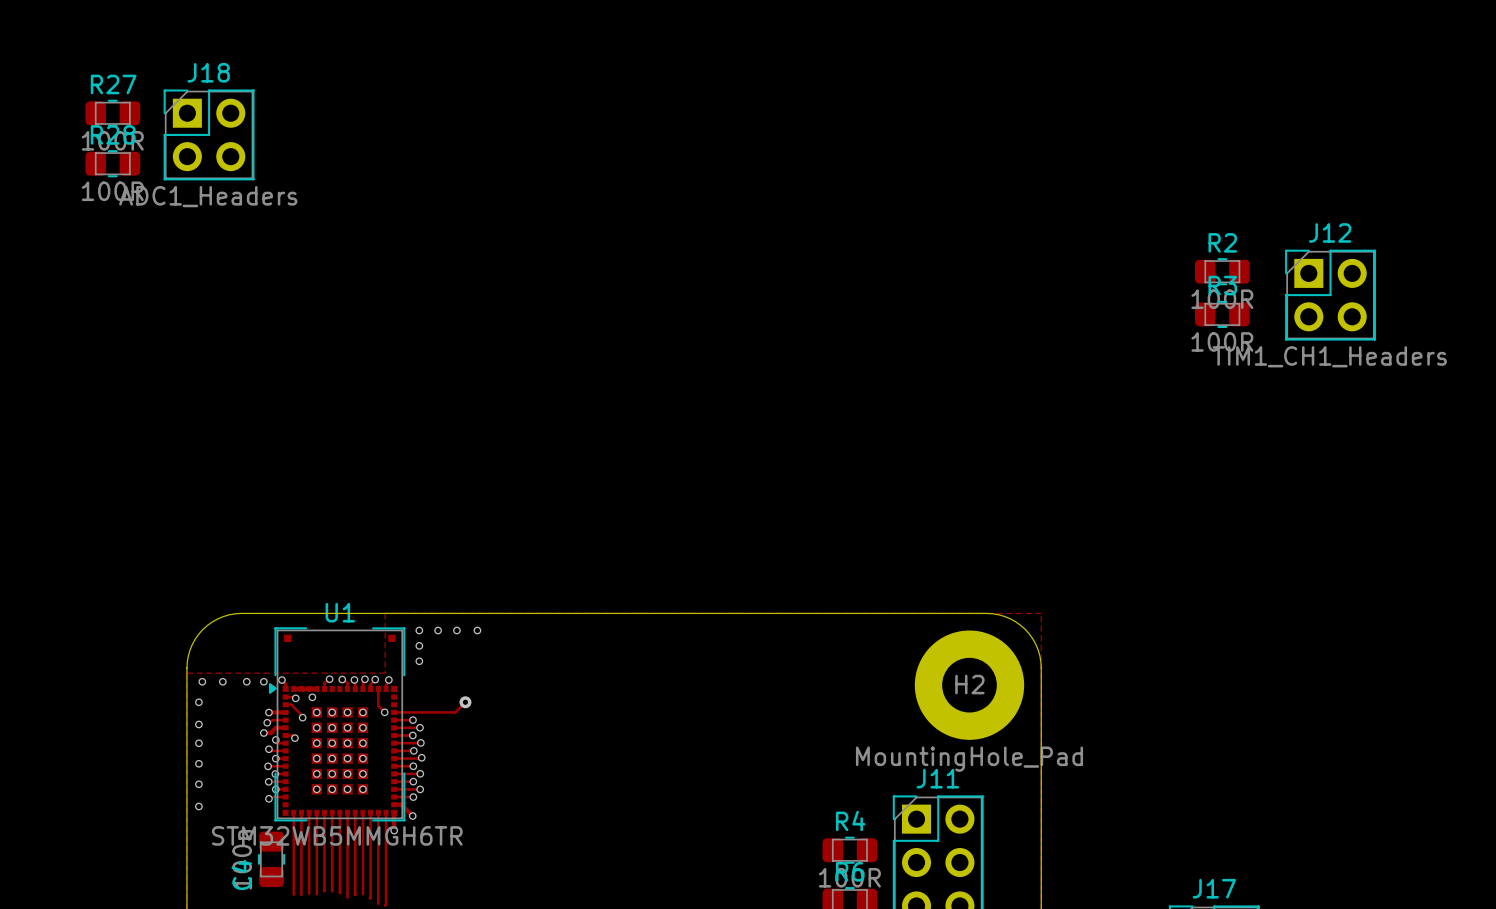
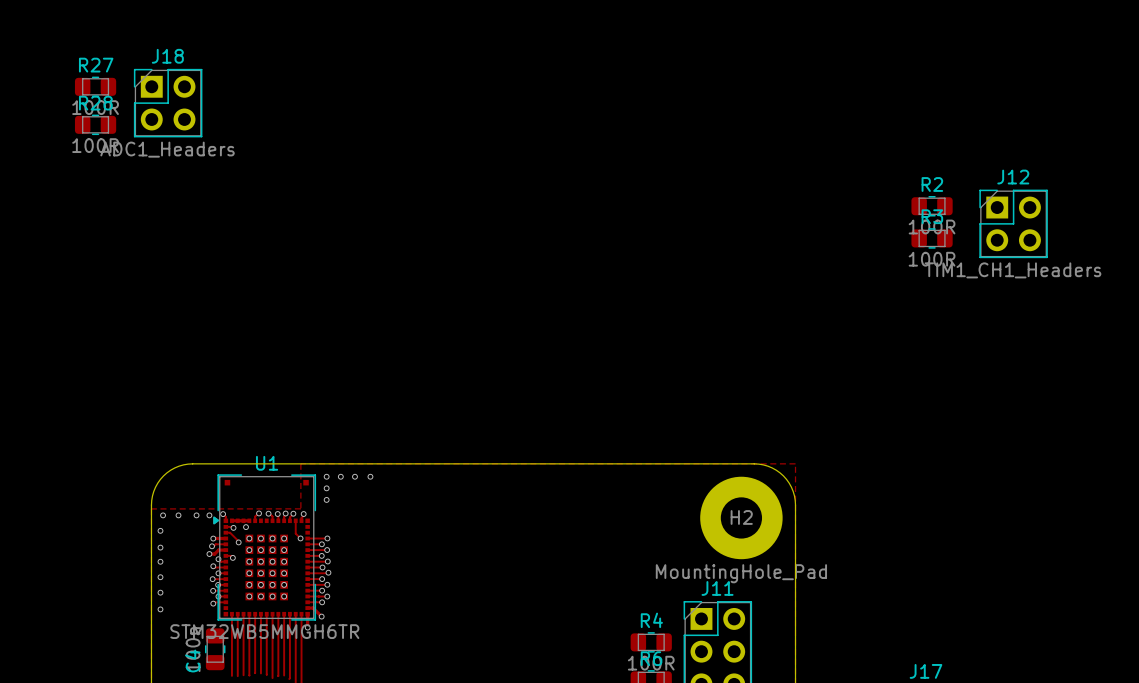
track: (465, 702) (455, 712) (420, 712) -> none
via: (465, 702) -> none
via: none -> (327, 538)

